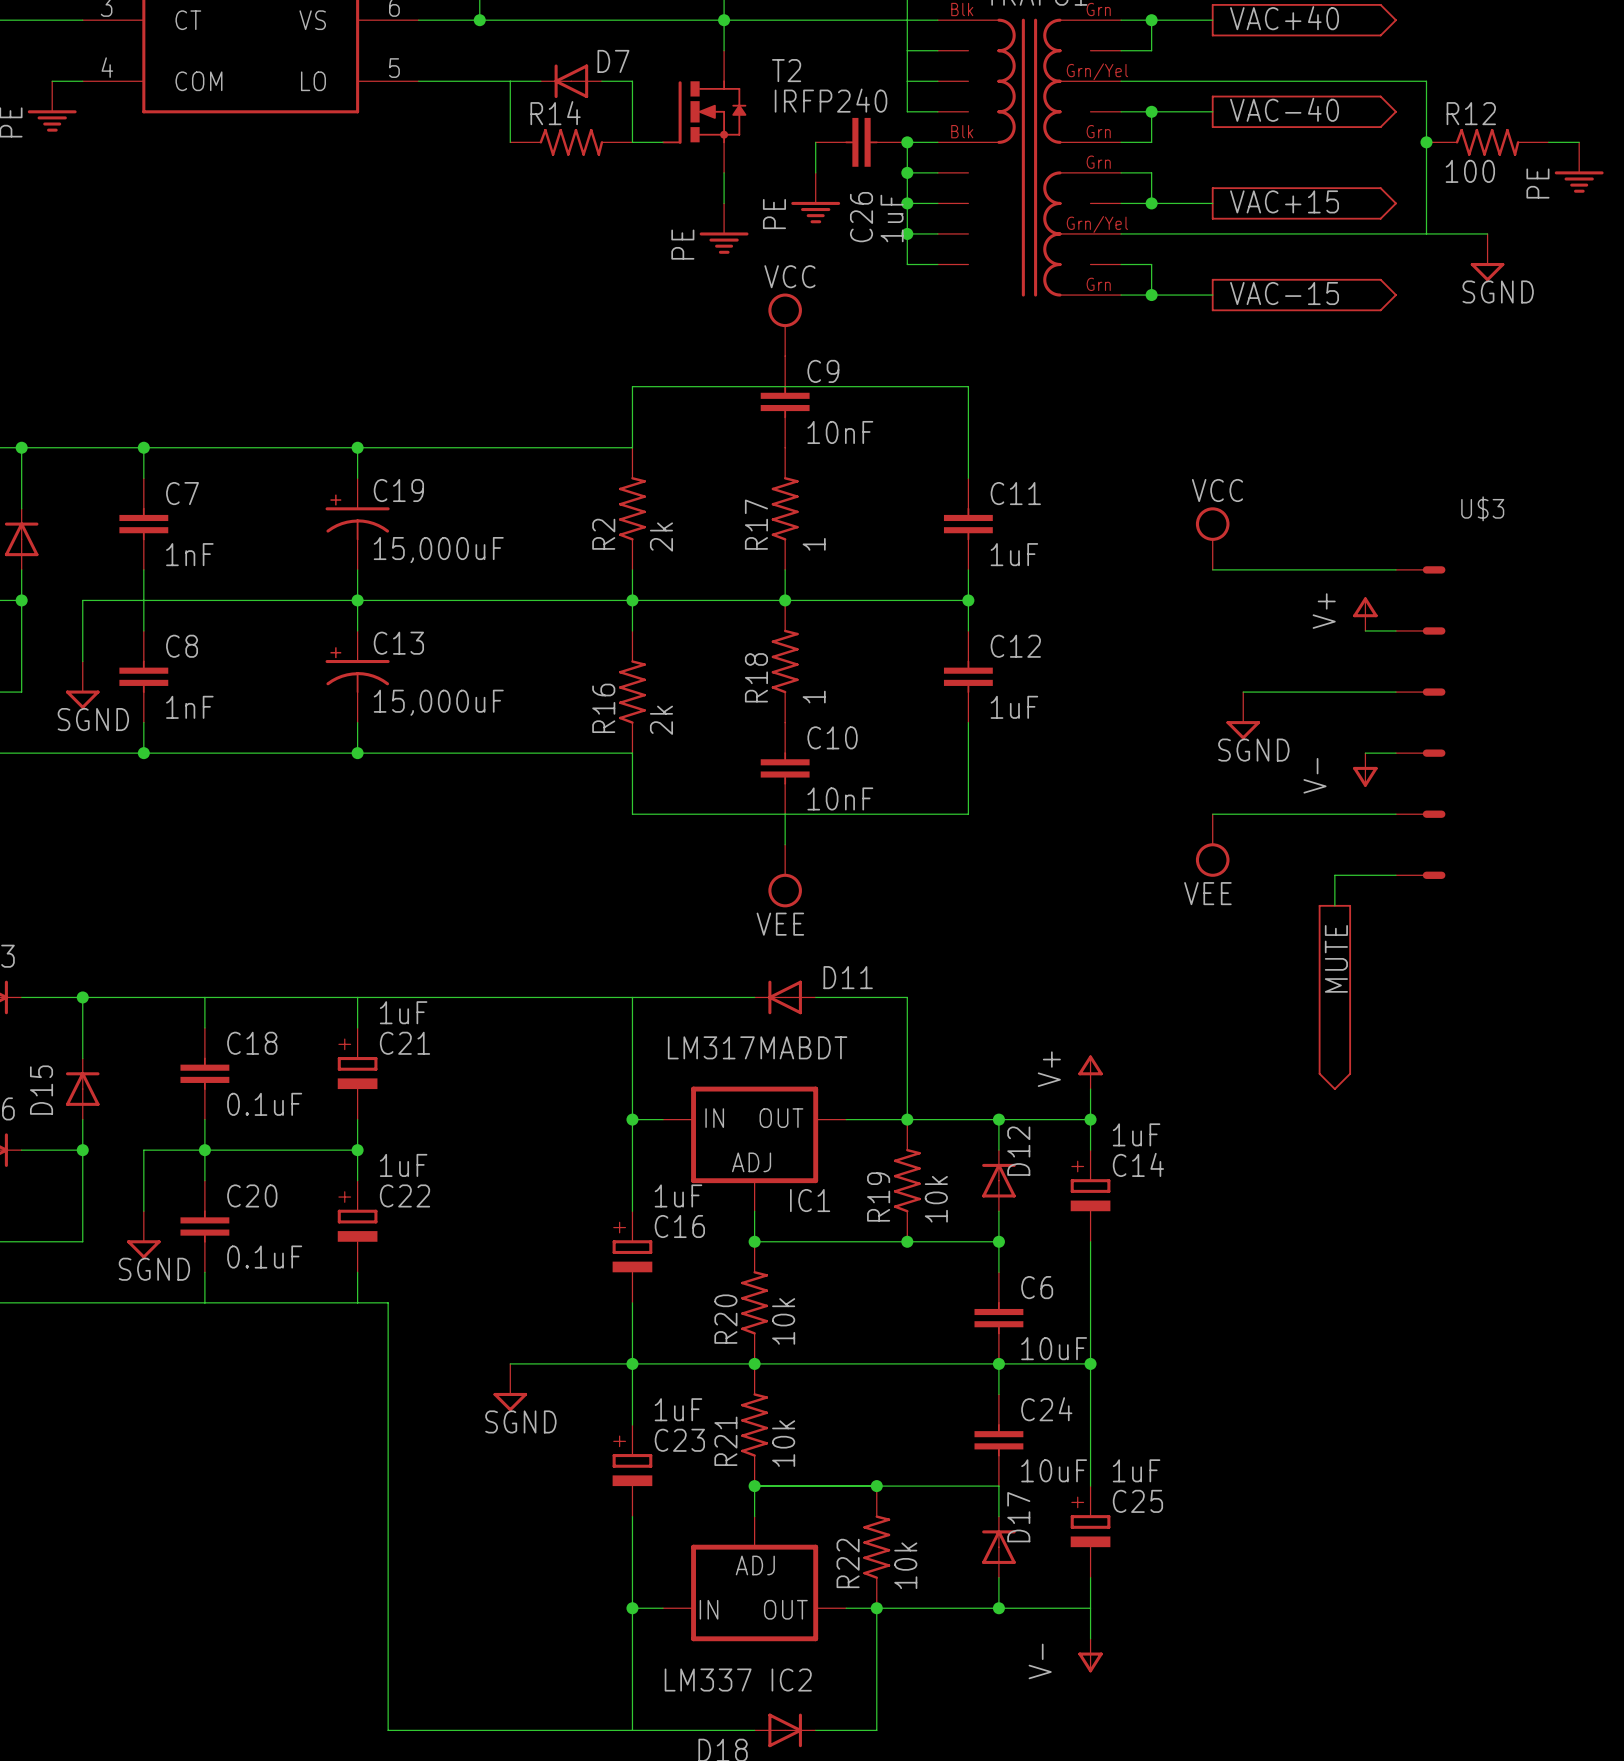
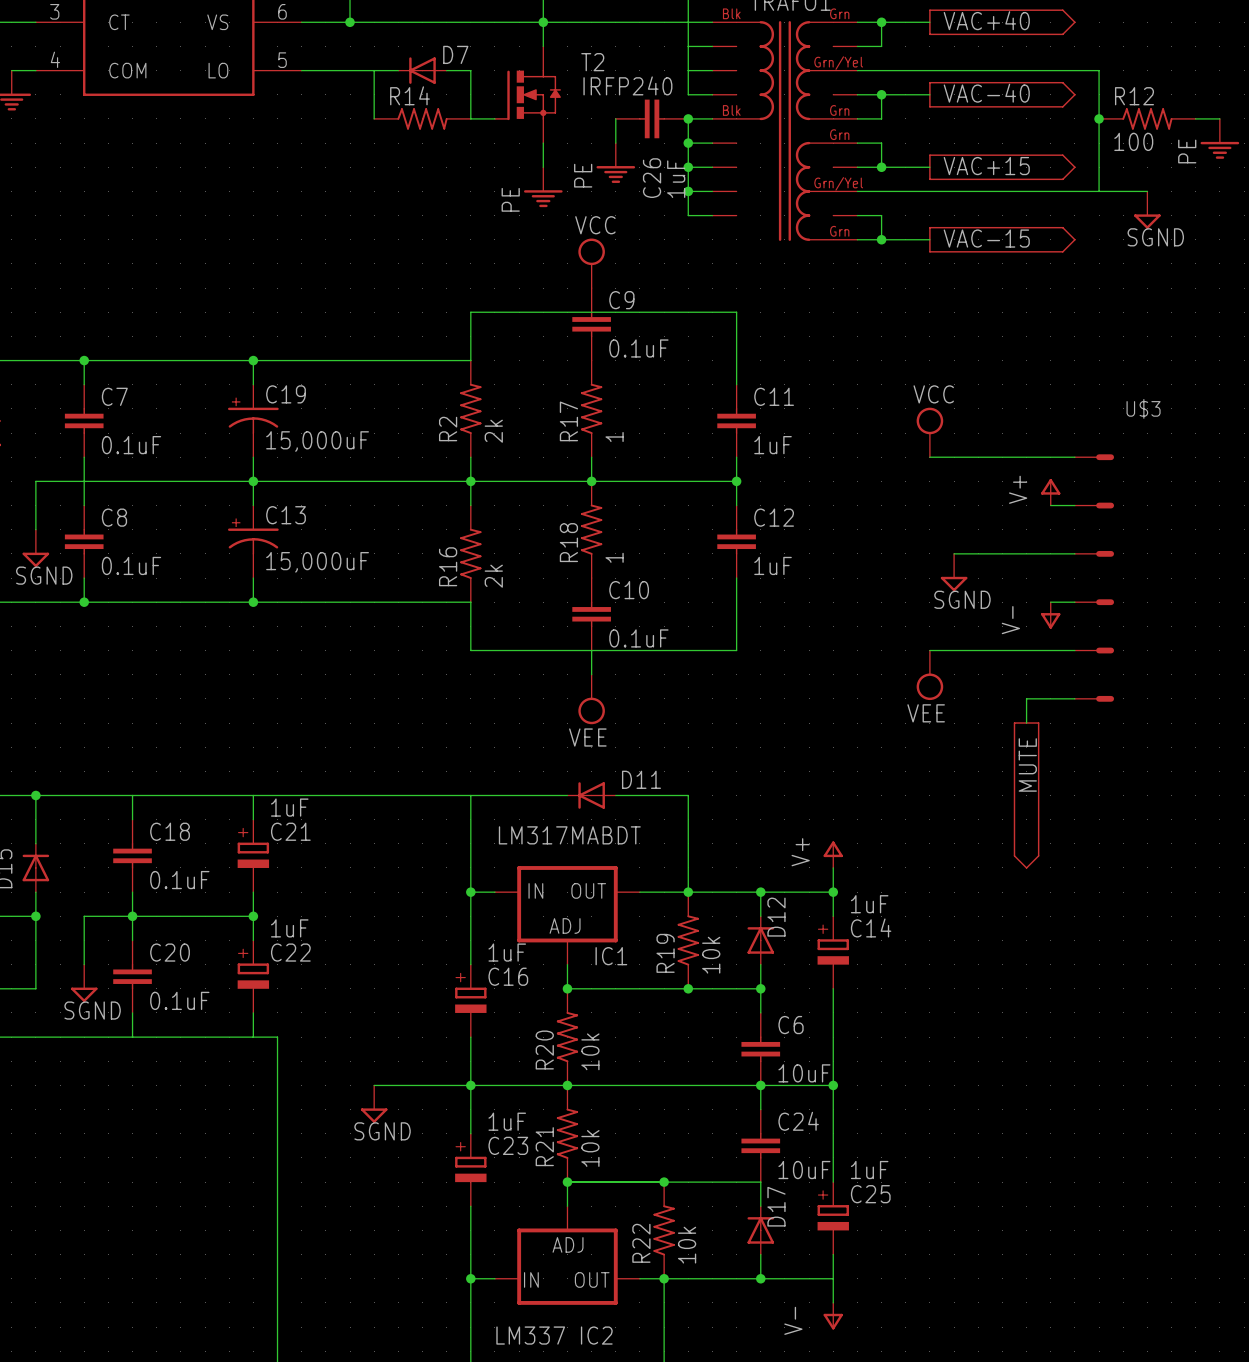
C9 value: 10nF (840, 432) -> 0.1uF (638, 348)
C7 value: 1nF (189, 554) -> 0.1uF (131, 445)
C8 value: 1nF (189, 707) -> 0.1uF (131, 565)
C10 value: 10nF (840, 798) -> 0.1uF (638, 638)

